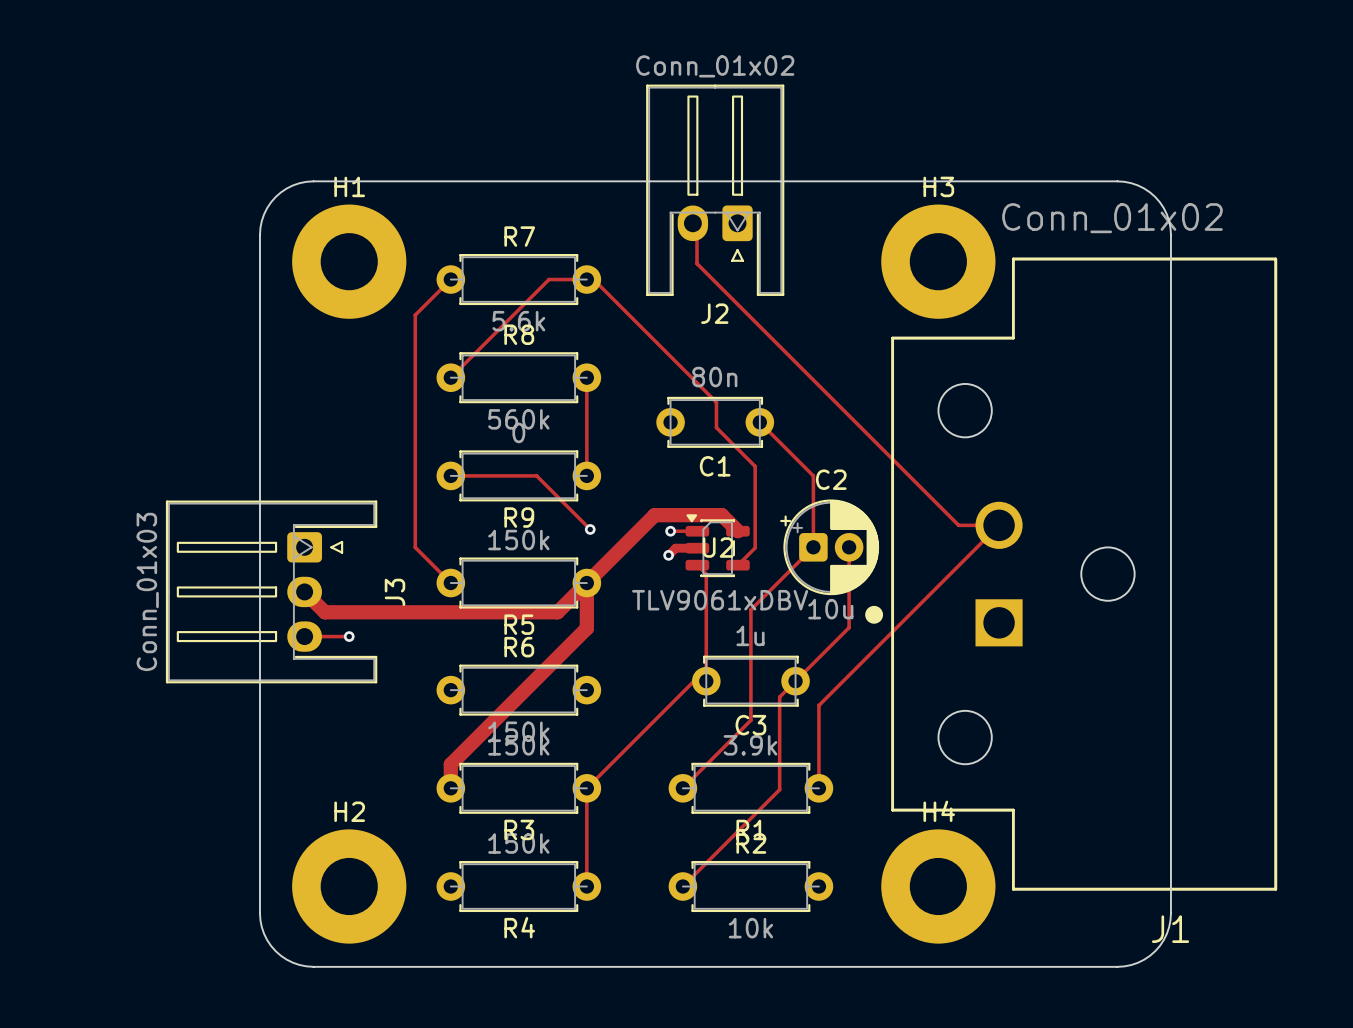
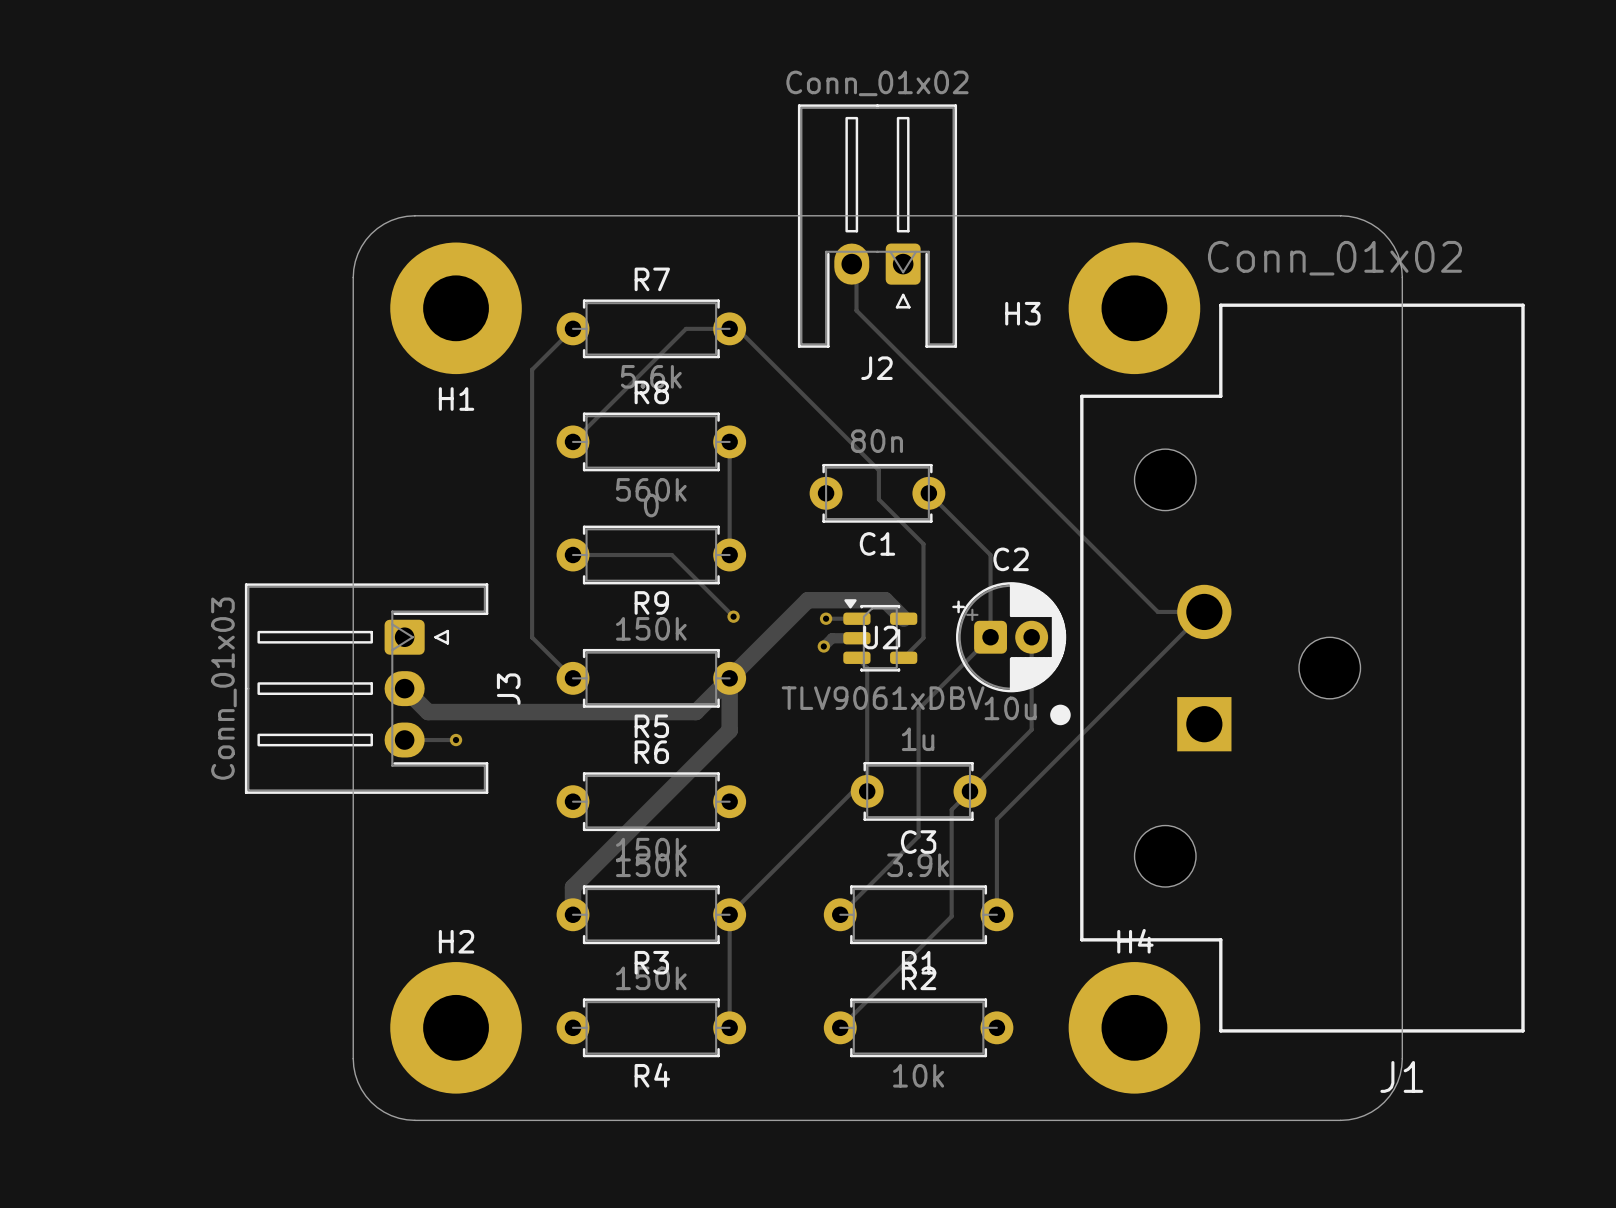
H1 name position: H1 (349, 186) -> H1 (456, 399)
H3 name position: H3 (938, 186) -> H3 (1022, 313)

